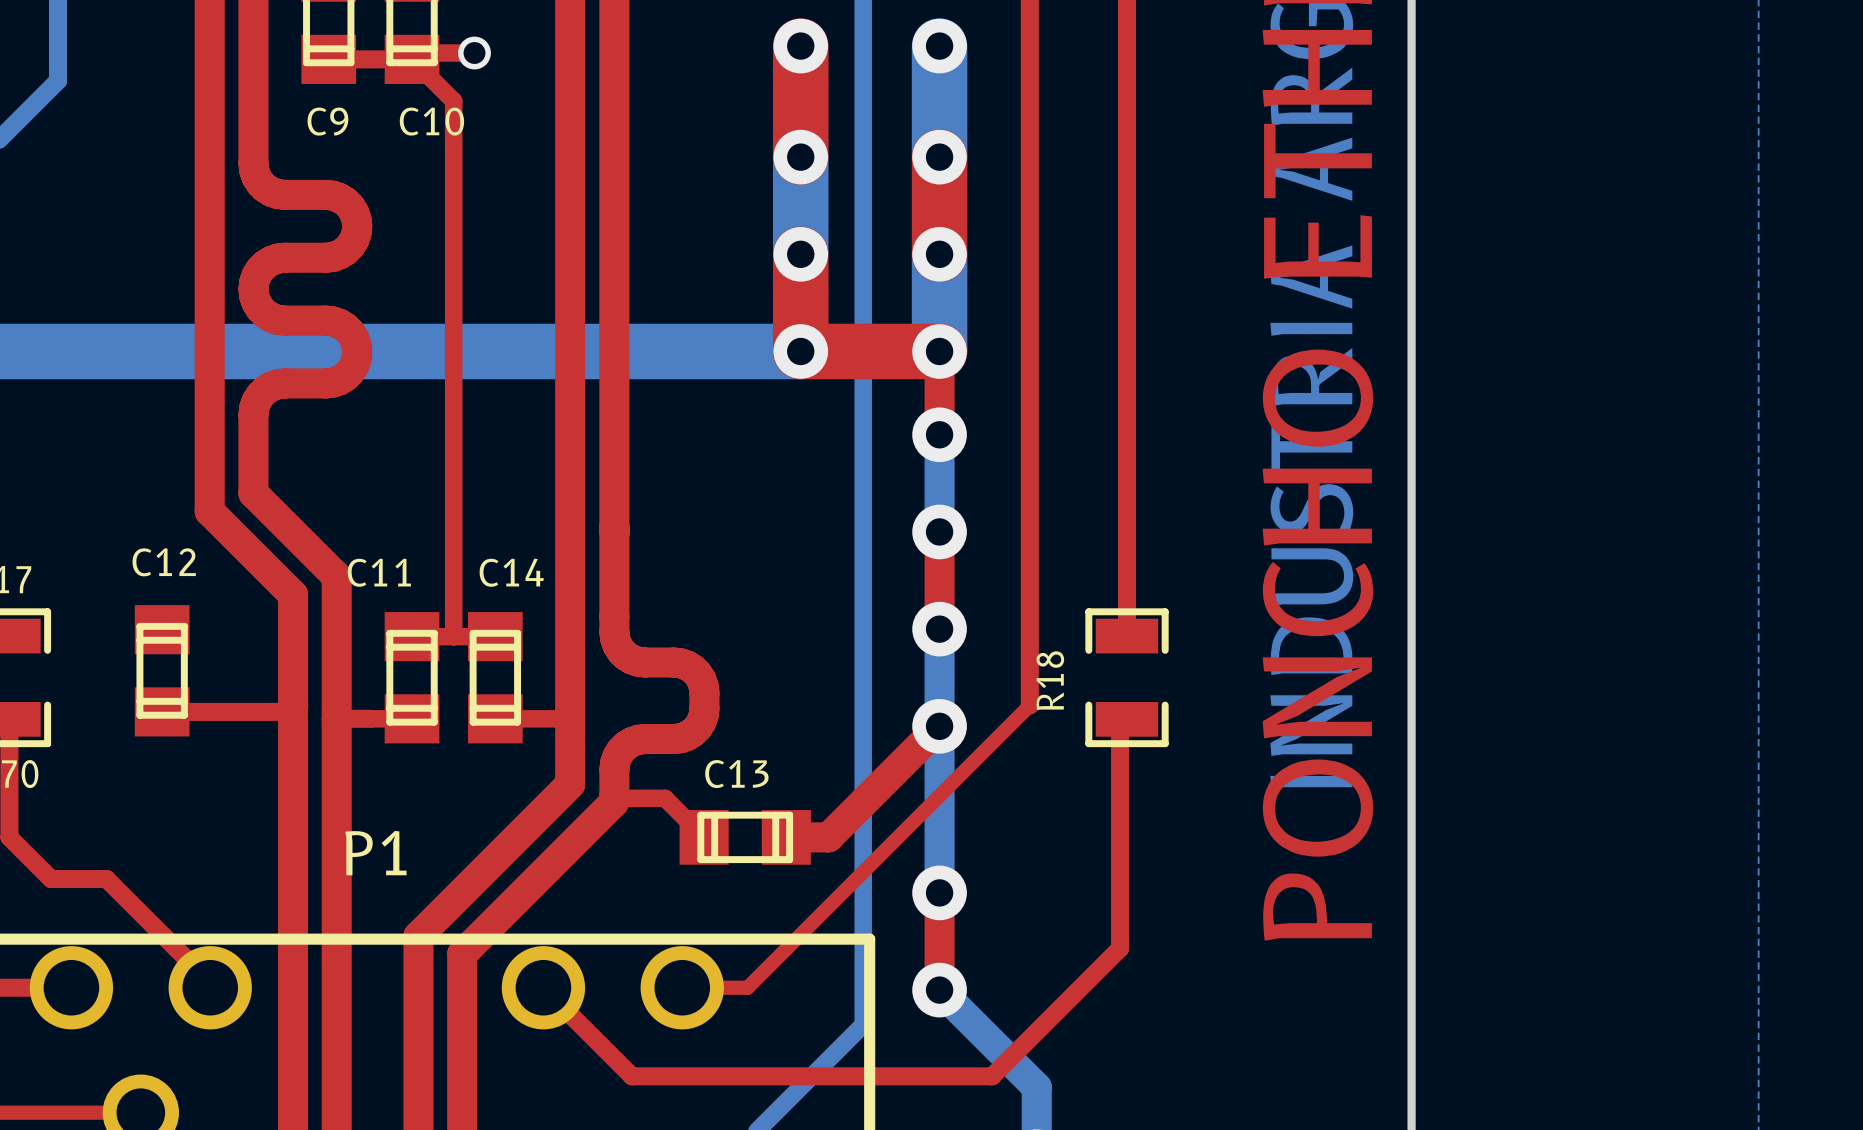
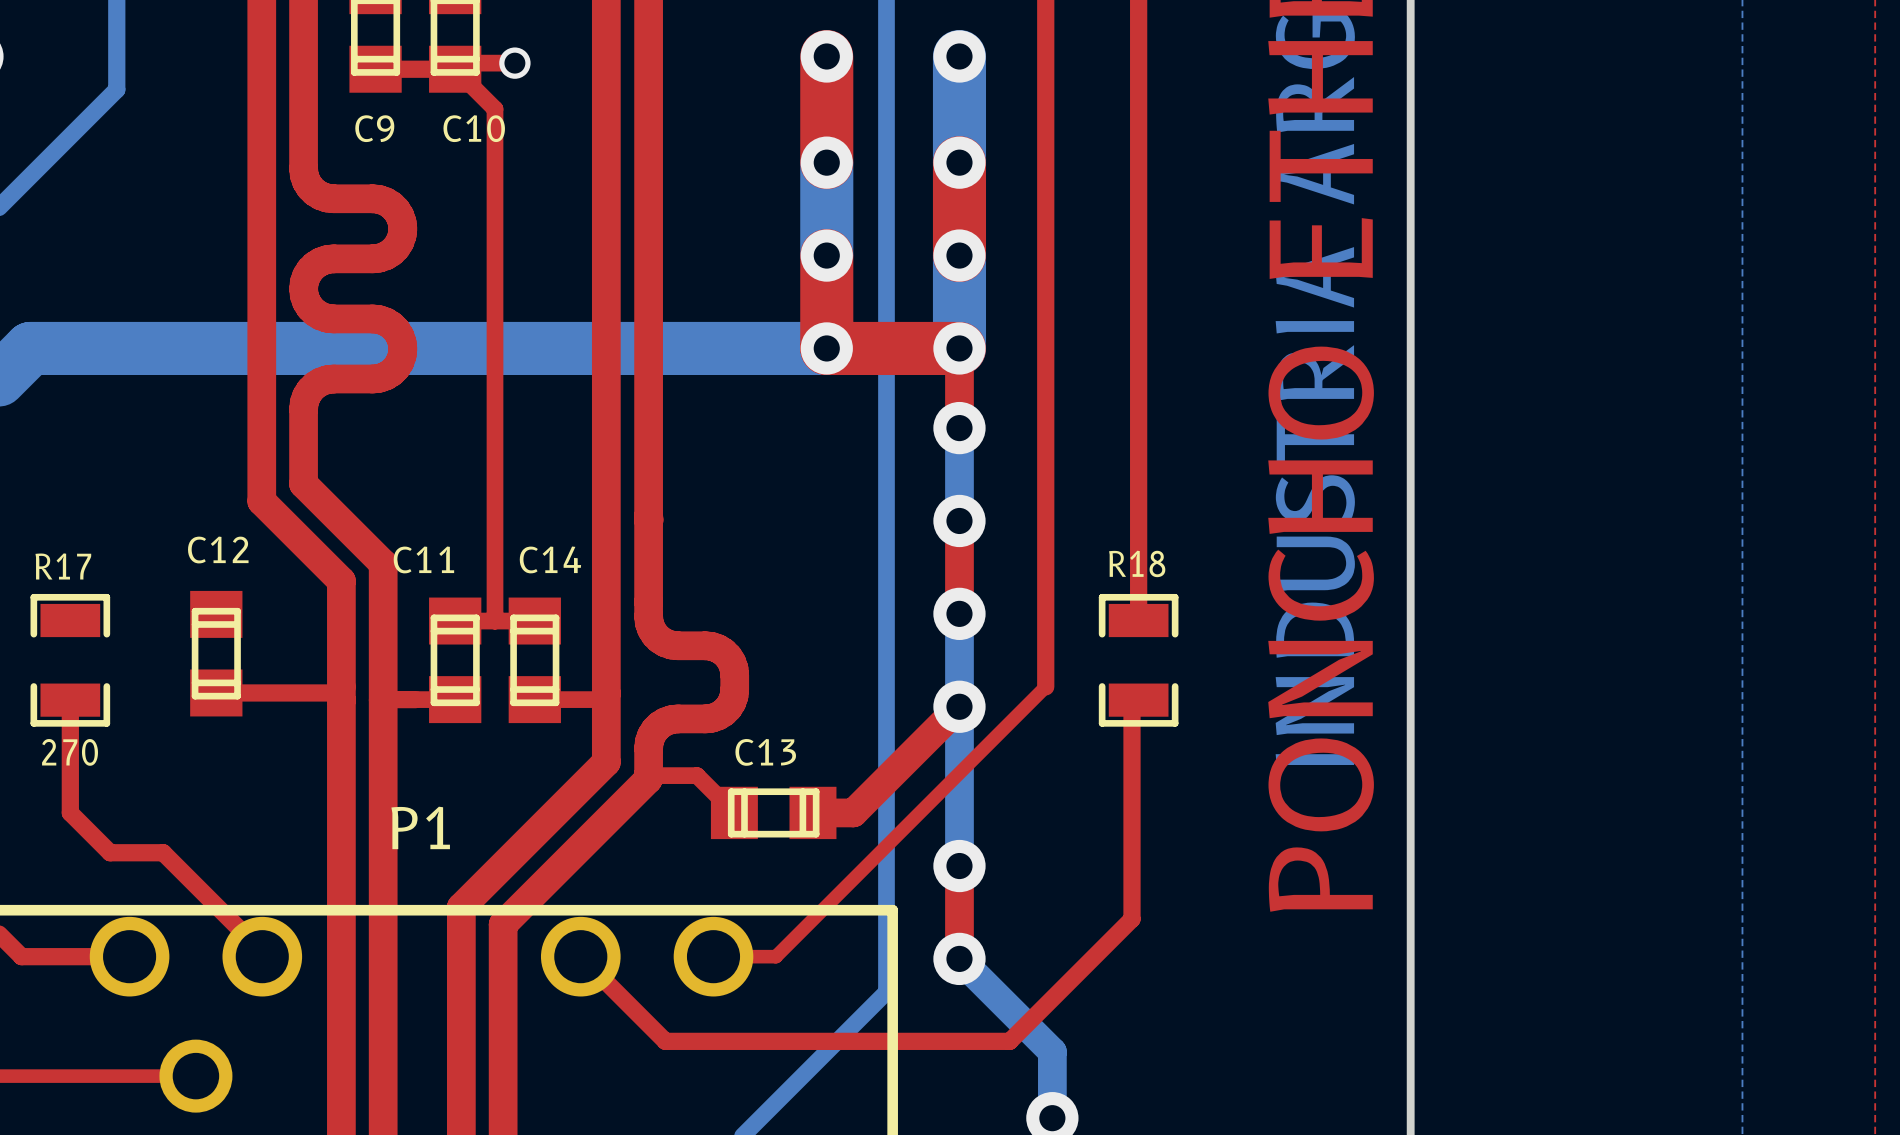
R18 name rotation: 0° (1050, 680) -> 90° clockwise (1137, 563)
R18 name position: R18 (1050, 680) -> R18 (1137, 563)

